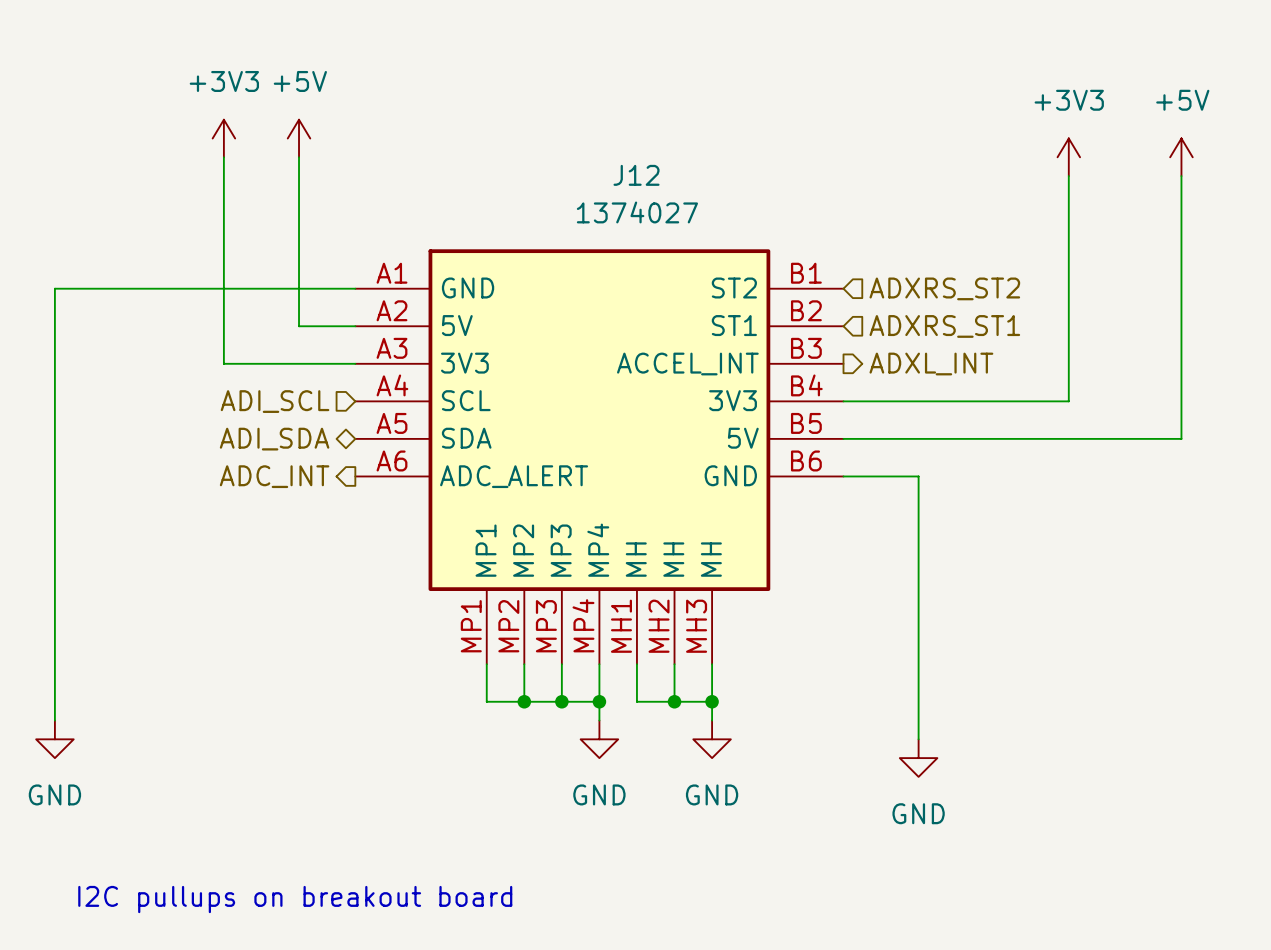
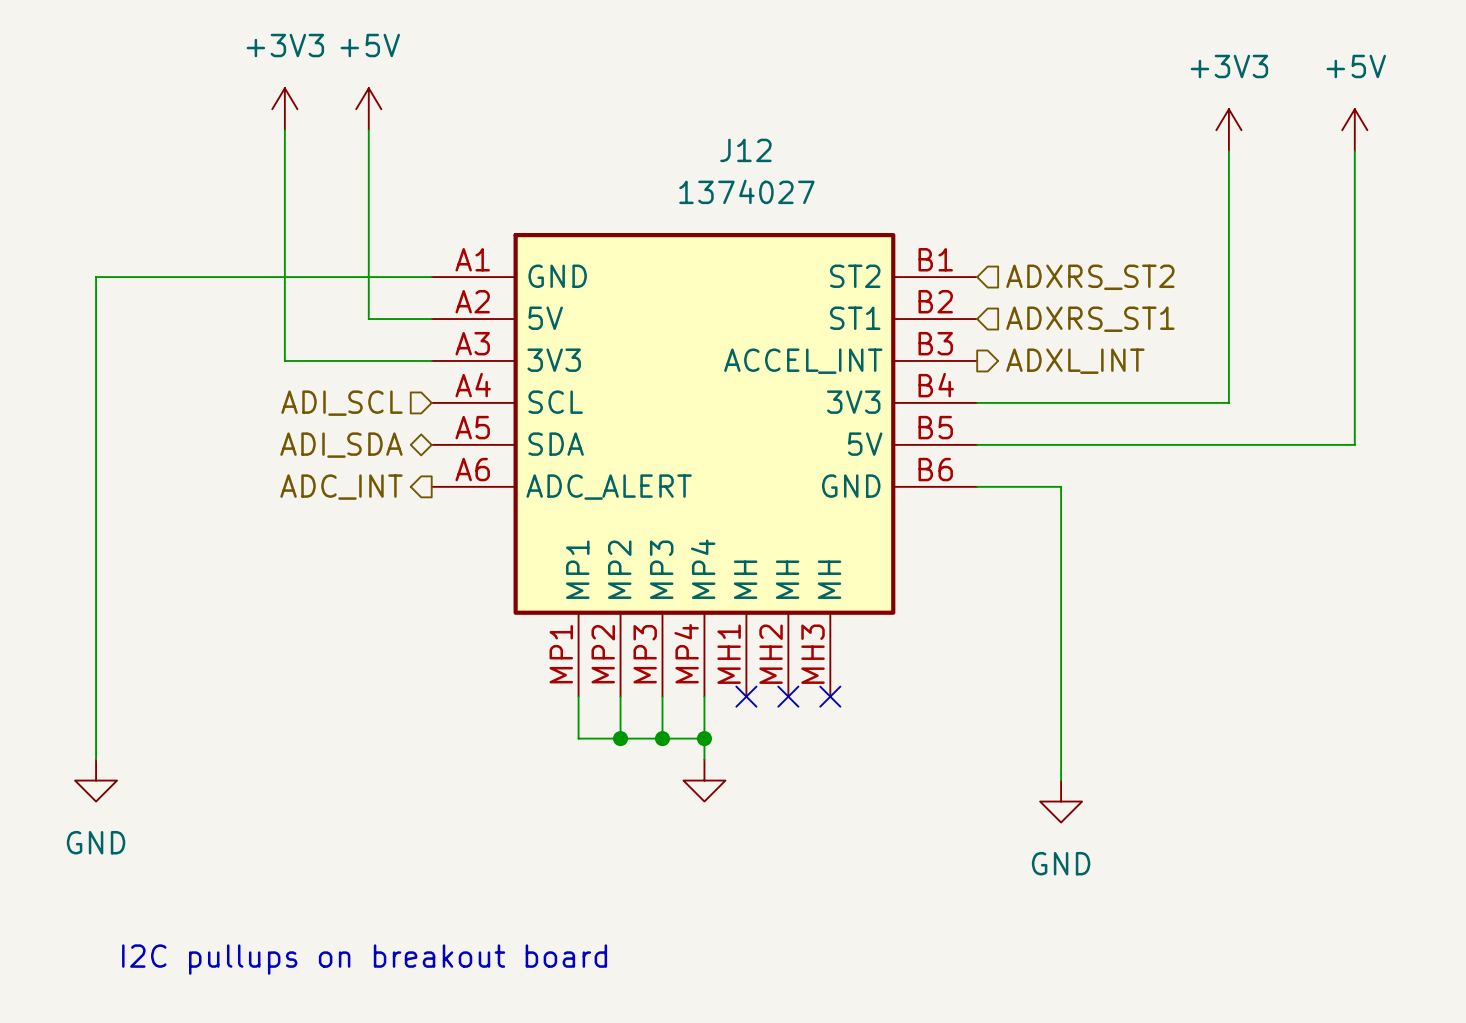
wire: (636, 664) (636, 701) (712, 701) -> none
no-connect mark: none -> (746, 696)
wire: (674, 664) (674, 701) -> none
no-connect mark: none -> (788, 696)
wire: (712, 664) (712, 720) -> none
no-connect mark: none -> (830, 696)
junction: (674, 701) -> none
junction: (712, 701) -> none
power symbol: GND (712, 739) -> none
power symbol text: GND (599, 794) -> none

